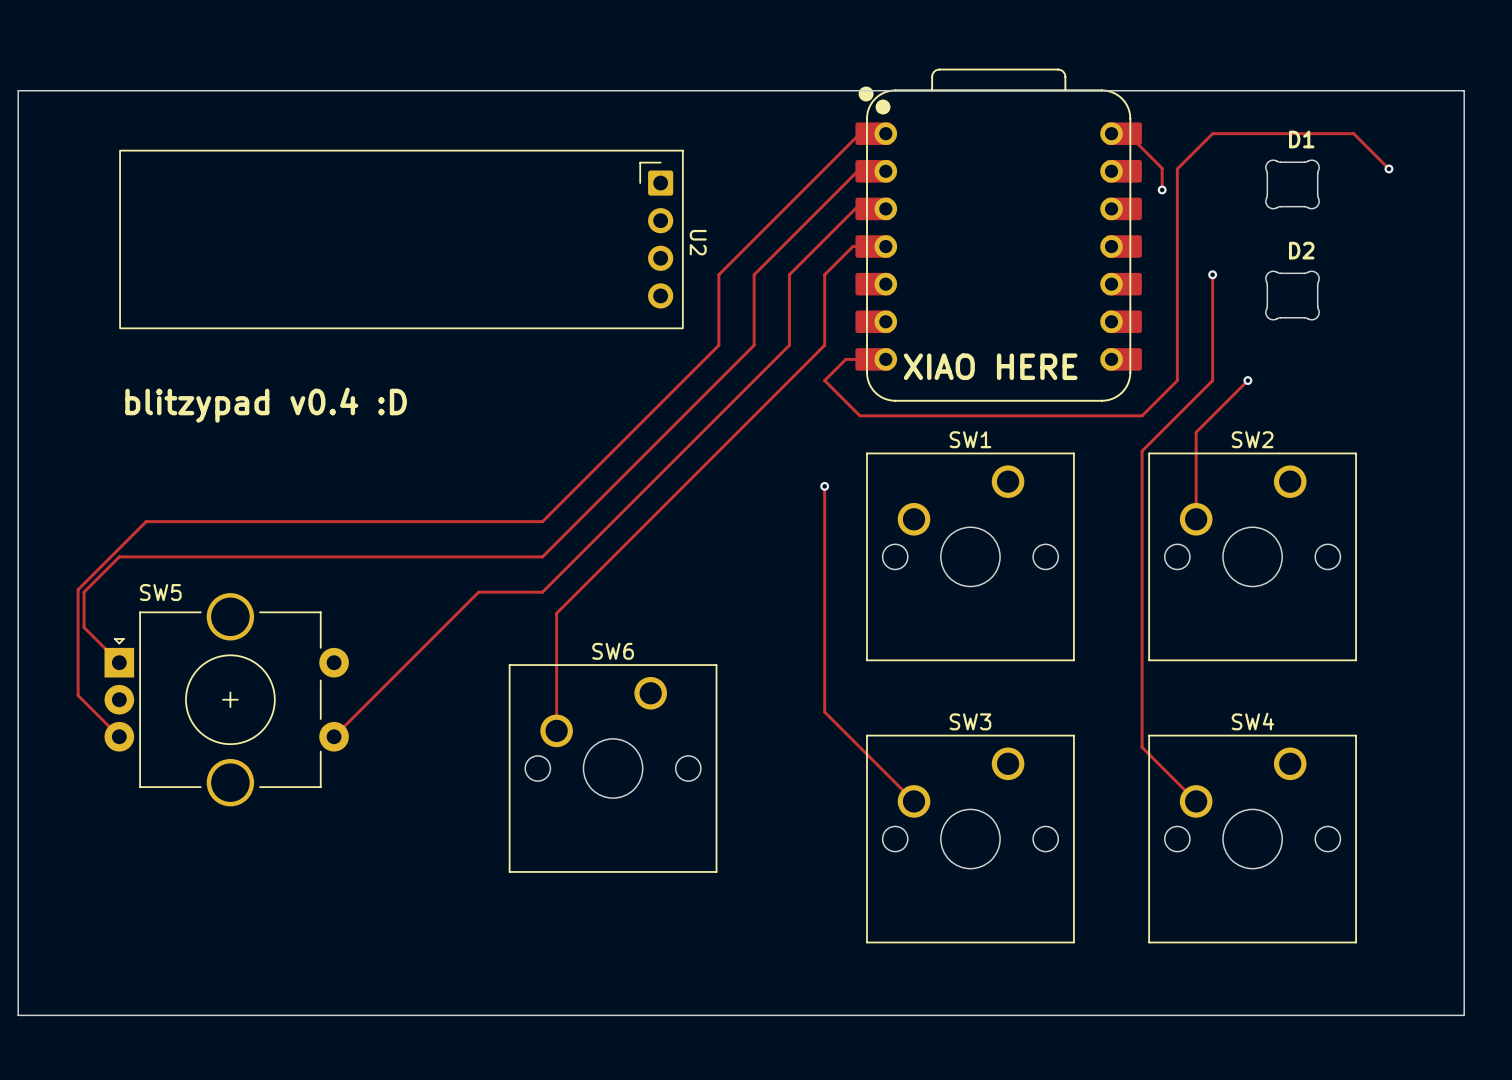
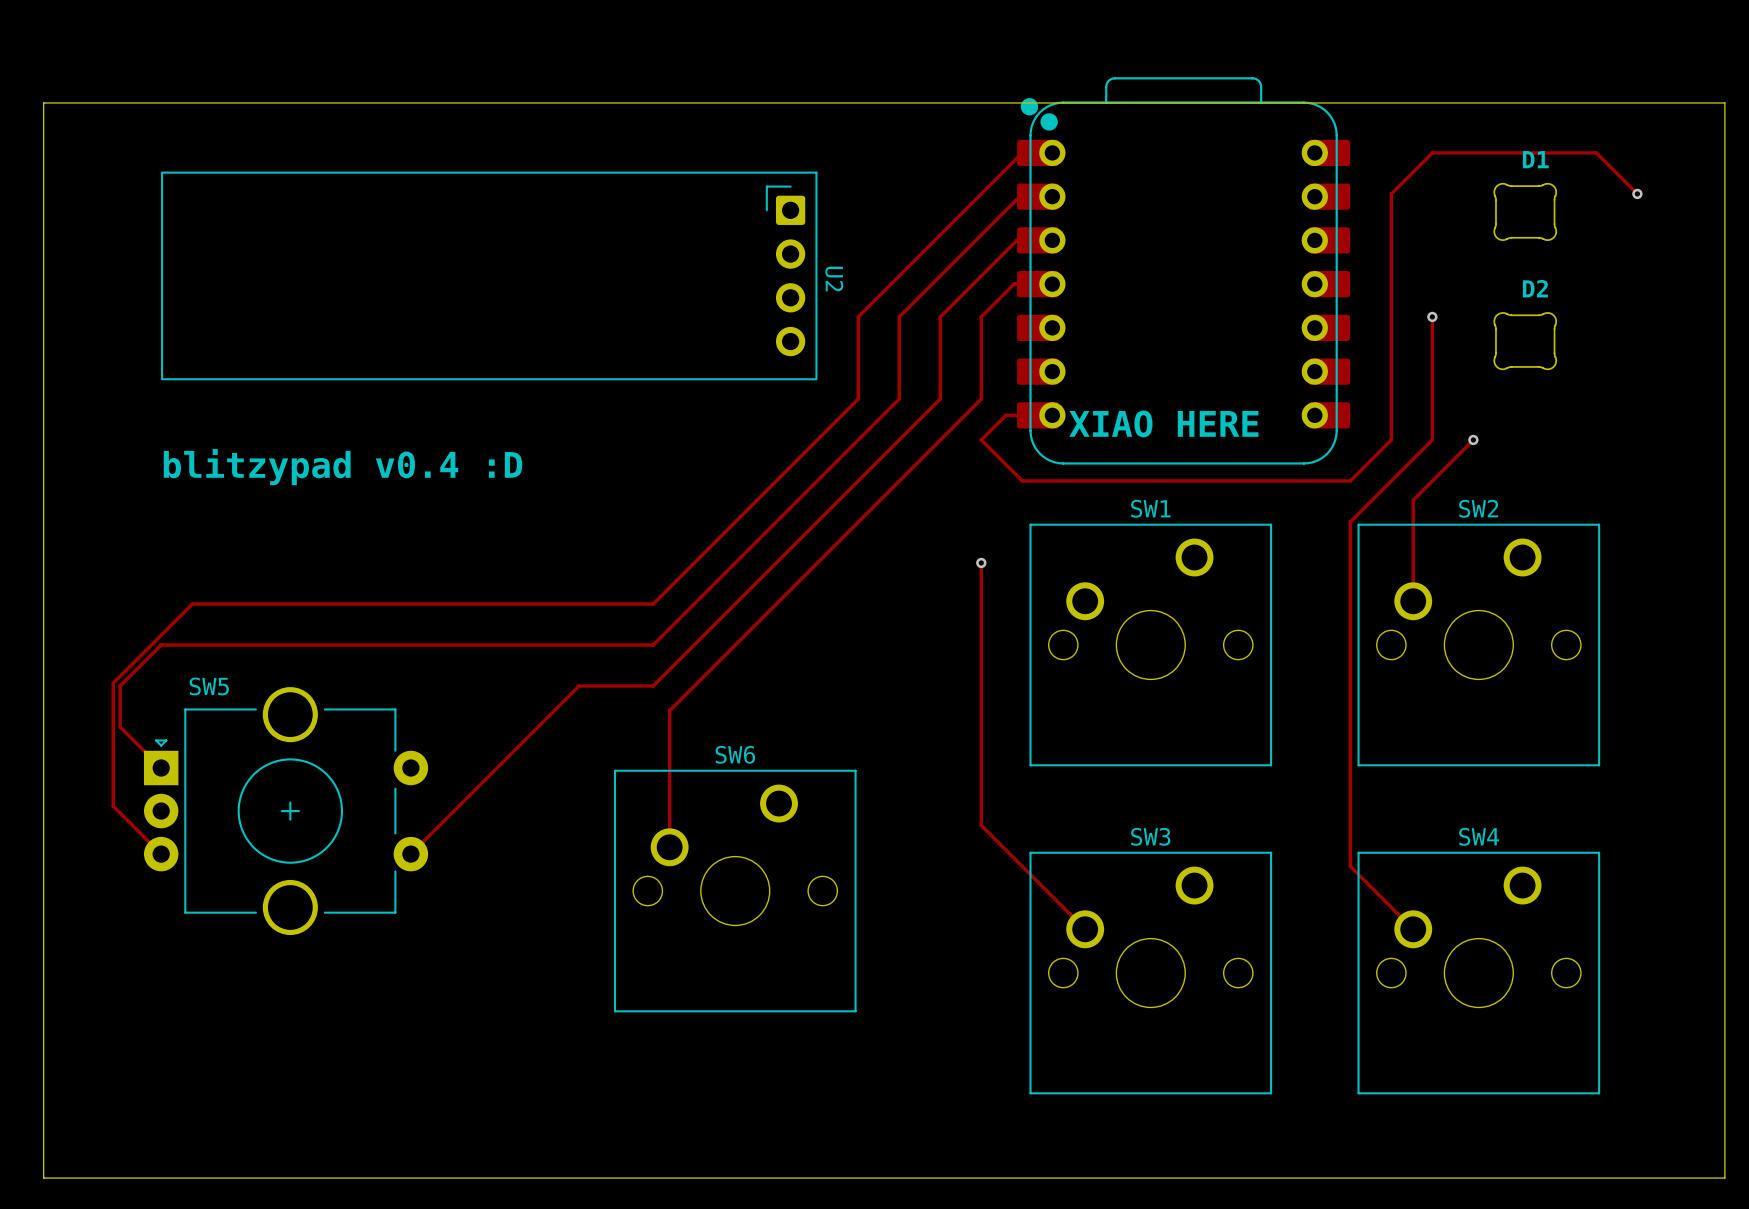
track: (1111, 133) (1127, 133) (1162, 168) (1162, 189) -> none
via: (1162, 189) -> none

